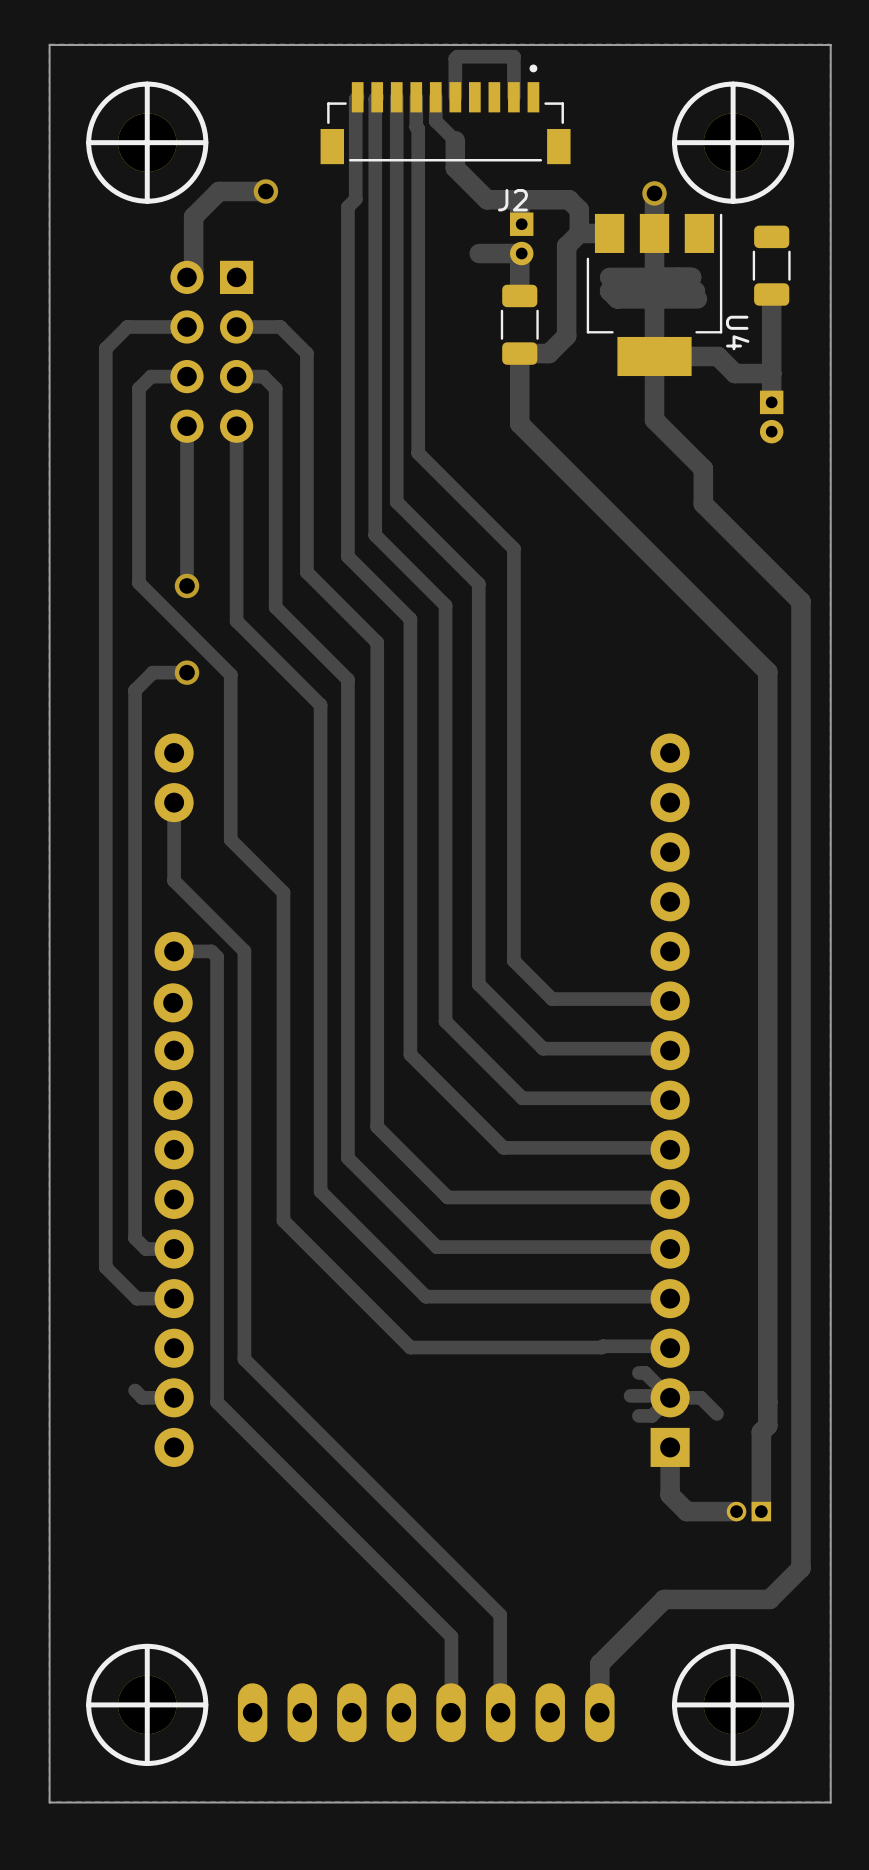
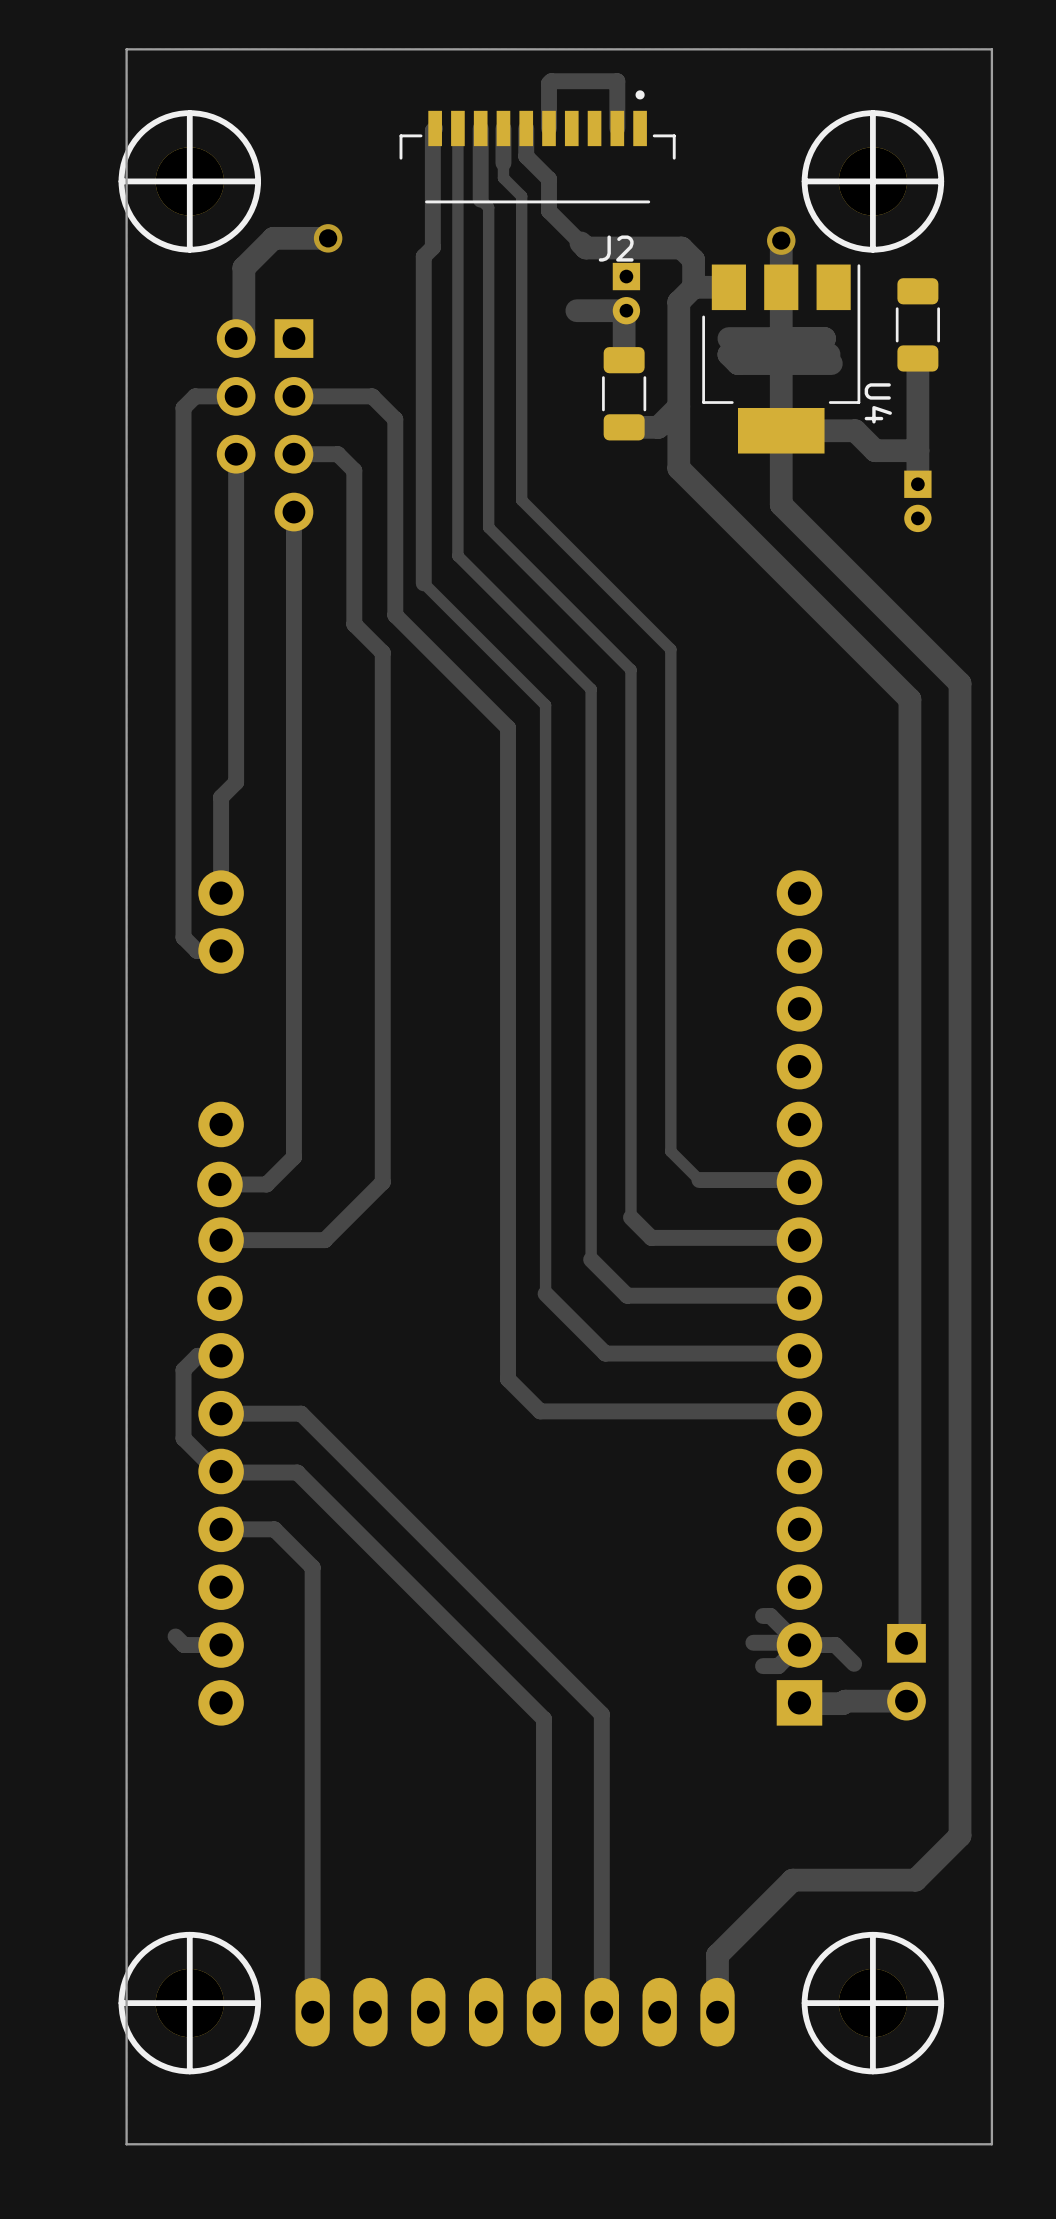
board edge: (830, 45) (830, 1802) (49, 1802) (49, 45) (830, 45) -> (991, 49) (991, 2144) (126, 2144) (126, 49) (991, 49)
J2 footprint: [320, 64, 571, 165] -> [399, 90, 676, 204]
track: (377, 97) (375, 99) (375, 535) (445, 605) (445, 1021) (491, 1067) -> (457, 128) (457, 556) (591, 689) (591, 1259)
track: (416, 127) (418, 128) (418, 453) (513, 548) (513, 960) (552, 999) (584, 999) -> (503, 163) (503, 178) (521, 196) (521, 500) (670, 649) (670, 1151) (699, 1180)
track width: thick (455, 140) (455, 168) (482, 195) -> thin (549, 179) (549, 211) (580, 242)
track: (396, 158) (396, 501) (478, 583) (478, 984) (525, 1031) -> (480, 199) (488, 207) (488, 527) (630, 669) (630, 1217)
part footprint: [170, 260, 254, 443] -> [216, 319, 314, 532]
track: (151, 327) (127, 327) (105, 348) (105, 1267) (136, 1298) (174, 1298) -> (195, 396) (183, 407) (183, 937) (197, 950) (221, 950)
track: (280, 327) (306, 353) (306, 572) (377, 642) (377, 1126) (420, 1169) -> (344, 396) (372, 396) (395, 419) (395, 615) (508, 727) (508, 1379)
track: none -> (678, 406) (678, 468) (909, 699) (909, 1639) (906, 1643)
track: (519, 353) (519, 423) (767, 671) (767, 1425) (761, 1432) (761, 1511) -> none
track: (187, 376) (151, 376) (138, 388) (138, 583) (230, 674) (230, 839) (283, 892) (283, 1220) (410, 1347) (668, 1346) (670, 1348) -> (236, 454) (236, 512)
track: (263, 376) (275, 388) (275, 607) (347, 679) (347, 1158) (436, 1247) (668, 1247) (670, 1249) -> (325, 454) (337, 454) (354, 470) (354, 624) (382, 652) (382, 1182) (324, 1240) (221, 1240)
track: (703, 468) (703, 503) (800, 601) (800, 1568) -> (838, 561) (960, 683) (960, 1835) (952, 1843)
track: (347, 487) (347, 556) (410, 619) (410, 1054) (452, 1096) -> (423, 583) (545, 705) (545, 1293)
track: none -> (236, 698) (236, 782) (221, 797) (221, 893)
via: (187, 585) -> none
track: (236, 621) (320, 705) (320, 1191) (425, 1296) (668, 1296) (670, 1298) -> (293, 739) (293, 1157) (266, 1184) (219, 1184)
track: (187, 672) (152, 672) (135, 690) (135, 1238) (145, 1249) (174, 1249) -> none
via: (187, 672) -> none
track: (174, 802) (174, 880) (244, 951) (244, 1359) (500, 1615) (500, 1712) -> (221, 1413) (301, 1413) (601, 1714) (601, 2012)
track: (174, 951) (211, 951) (217, 956) (217, 1402) (451, 1636) (451, 1712) -> (221, 1355) (197, 1355) (183, 1370) (183, 1438) (217, 1472) (297, 1472) (543, 1719) (543, 2012)
track: none -> (221, 1529) (274, 1529) (312, 1567) (312, 2012)
part: none -> (906, 1672)
track: (670, 1447) (670, 1494) (686, 1511) (736, 1511) -> (799, 1702) (906, 1701)
part: (748, 1511) -> none

